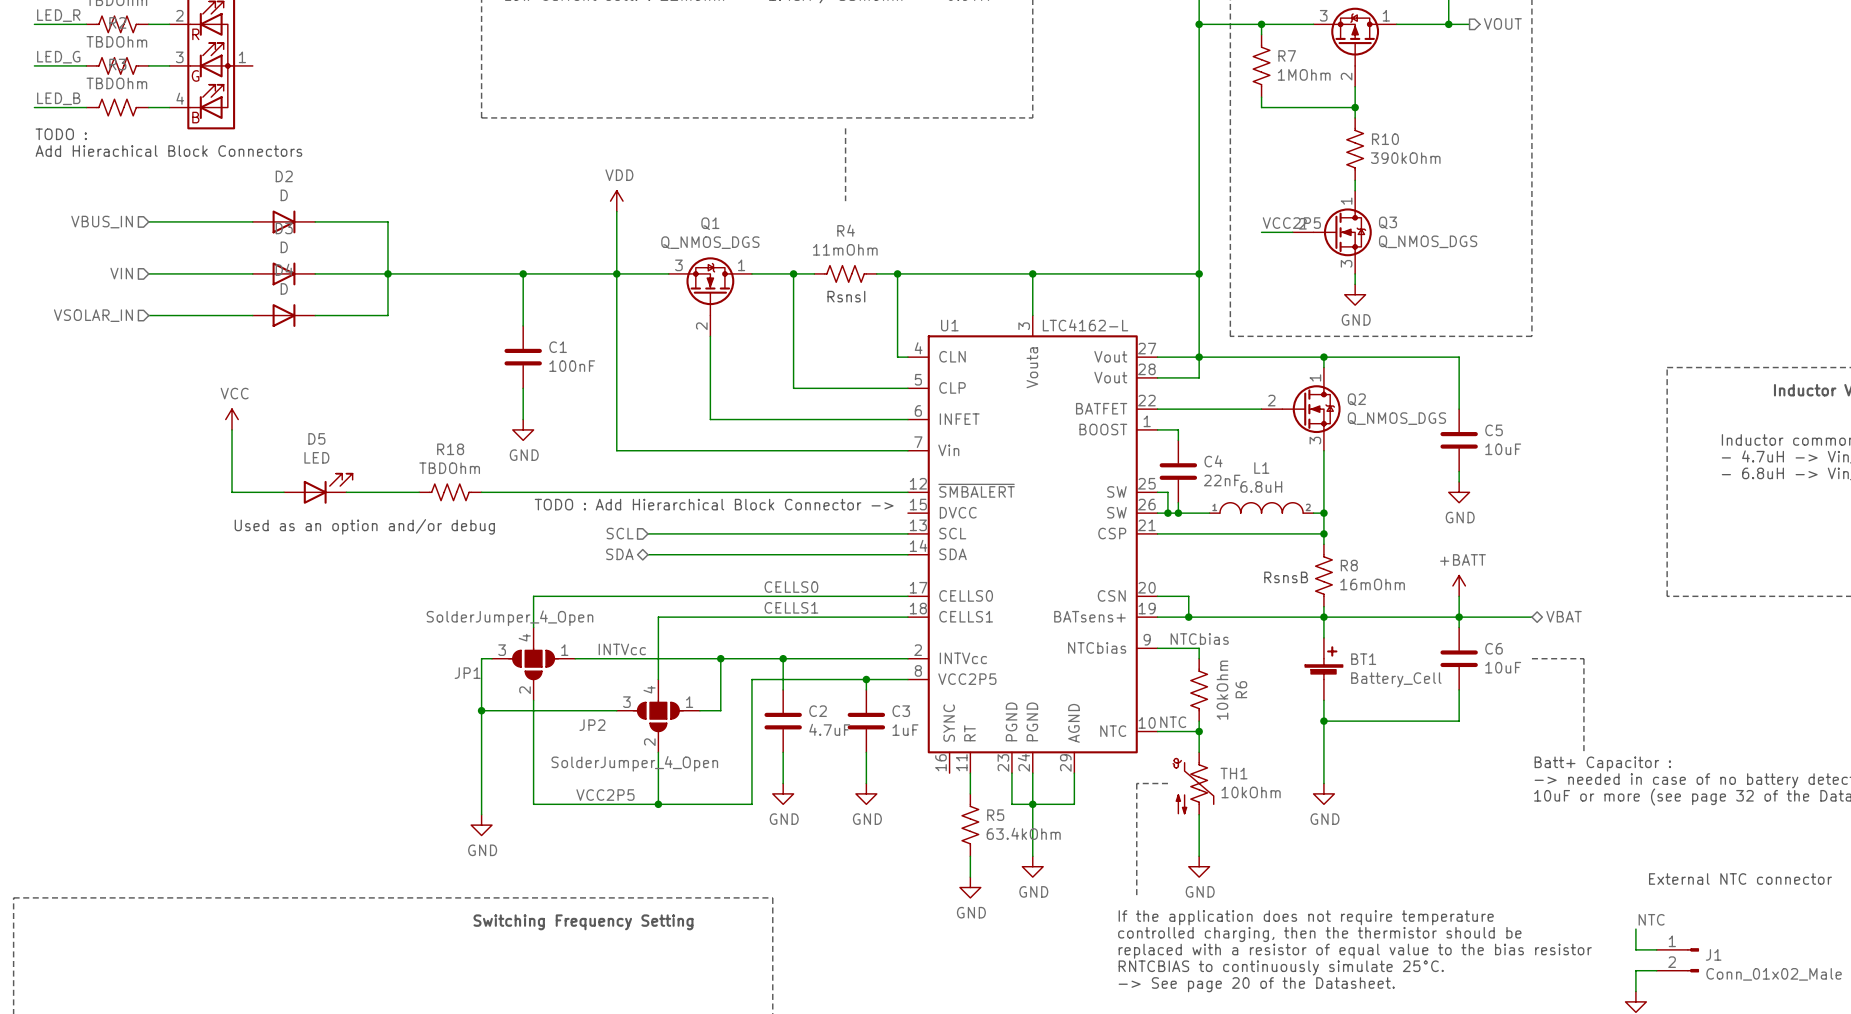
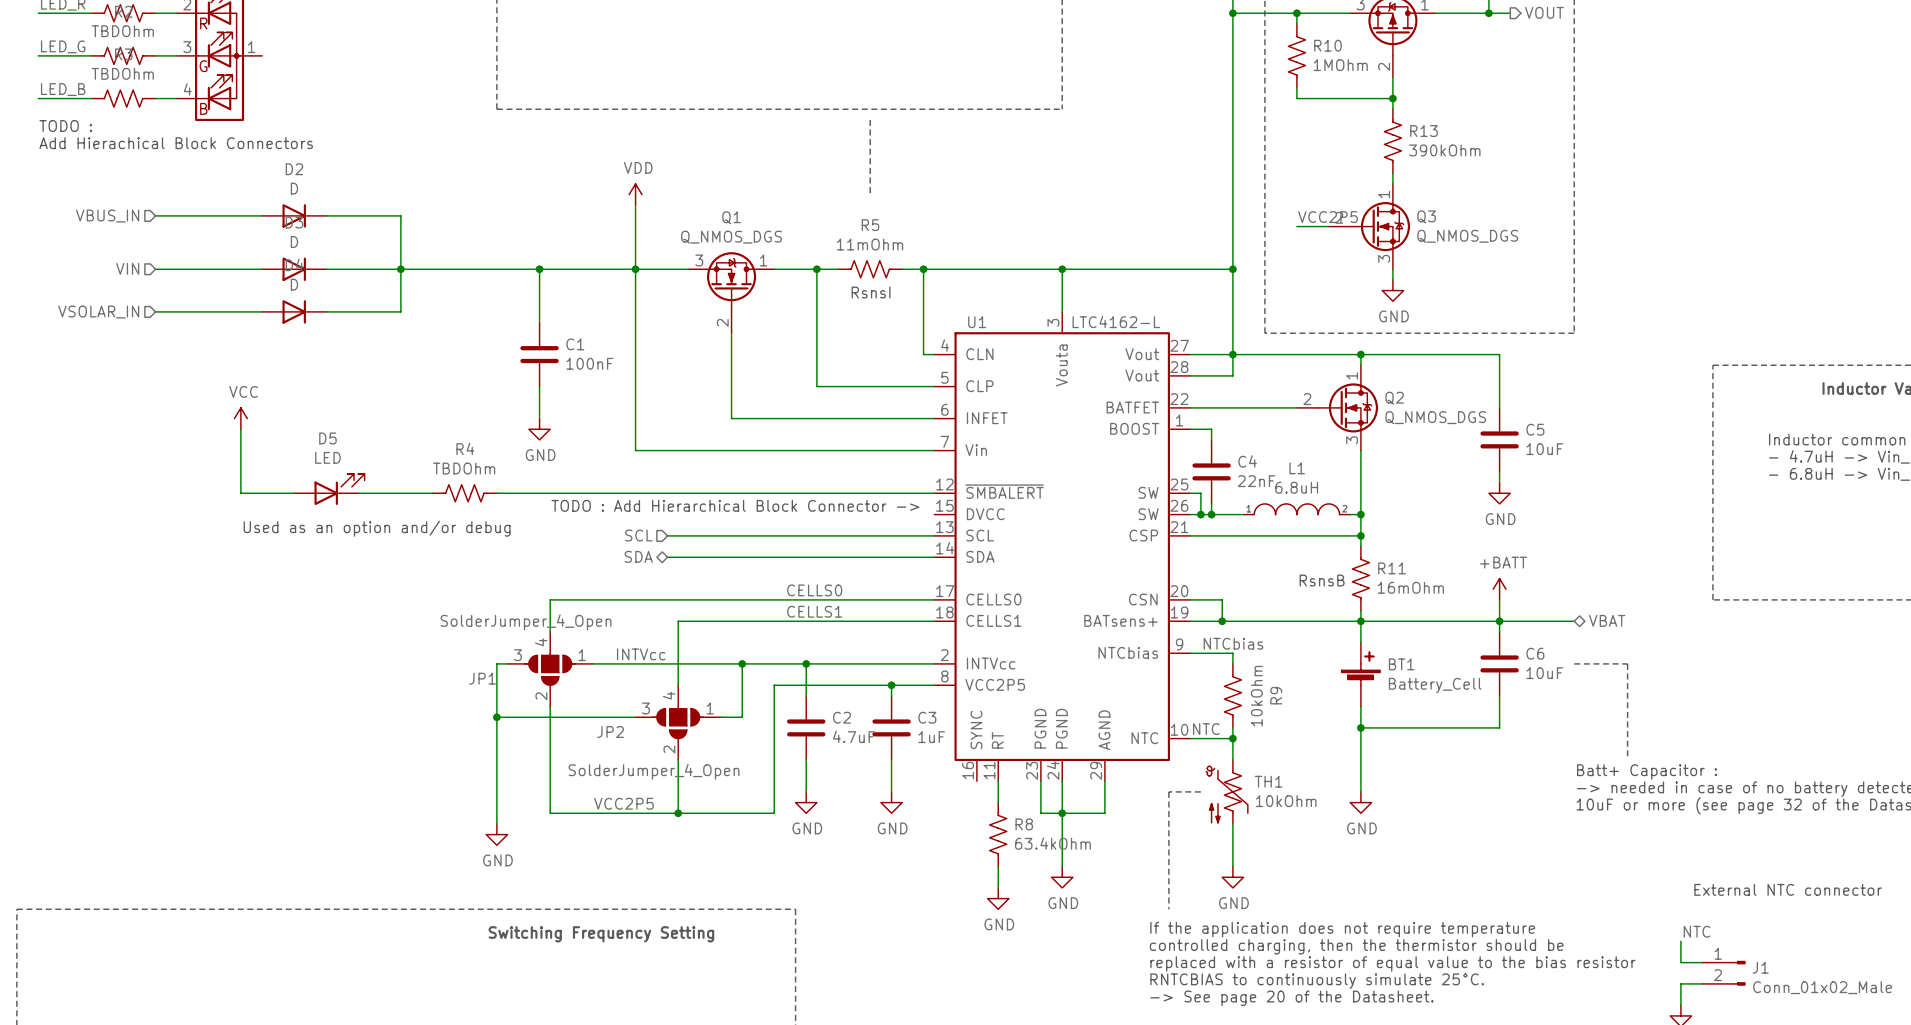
R7 name: R7 (1287, 56) -> R10 (1328, 45)
R10 name: R10 (1385, 139) -> R13 (1424, 131)
R4 name: R4 (846, 230) -> R5 (870, 225)
R18 name: R18 (450, 449) -> R4 (465, 448)
R8 name: R8 (1349, 565) -> R11 (1392, 568)
R6 name: R6 (1241, 689) -> R9 (1276, 695)
R5 name: R5 (995, 815) -> R8 (1024, 824)

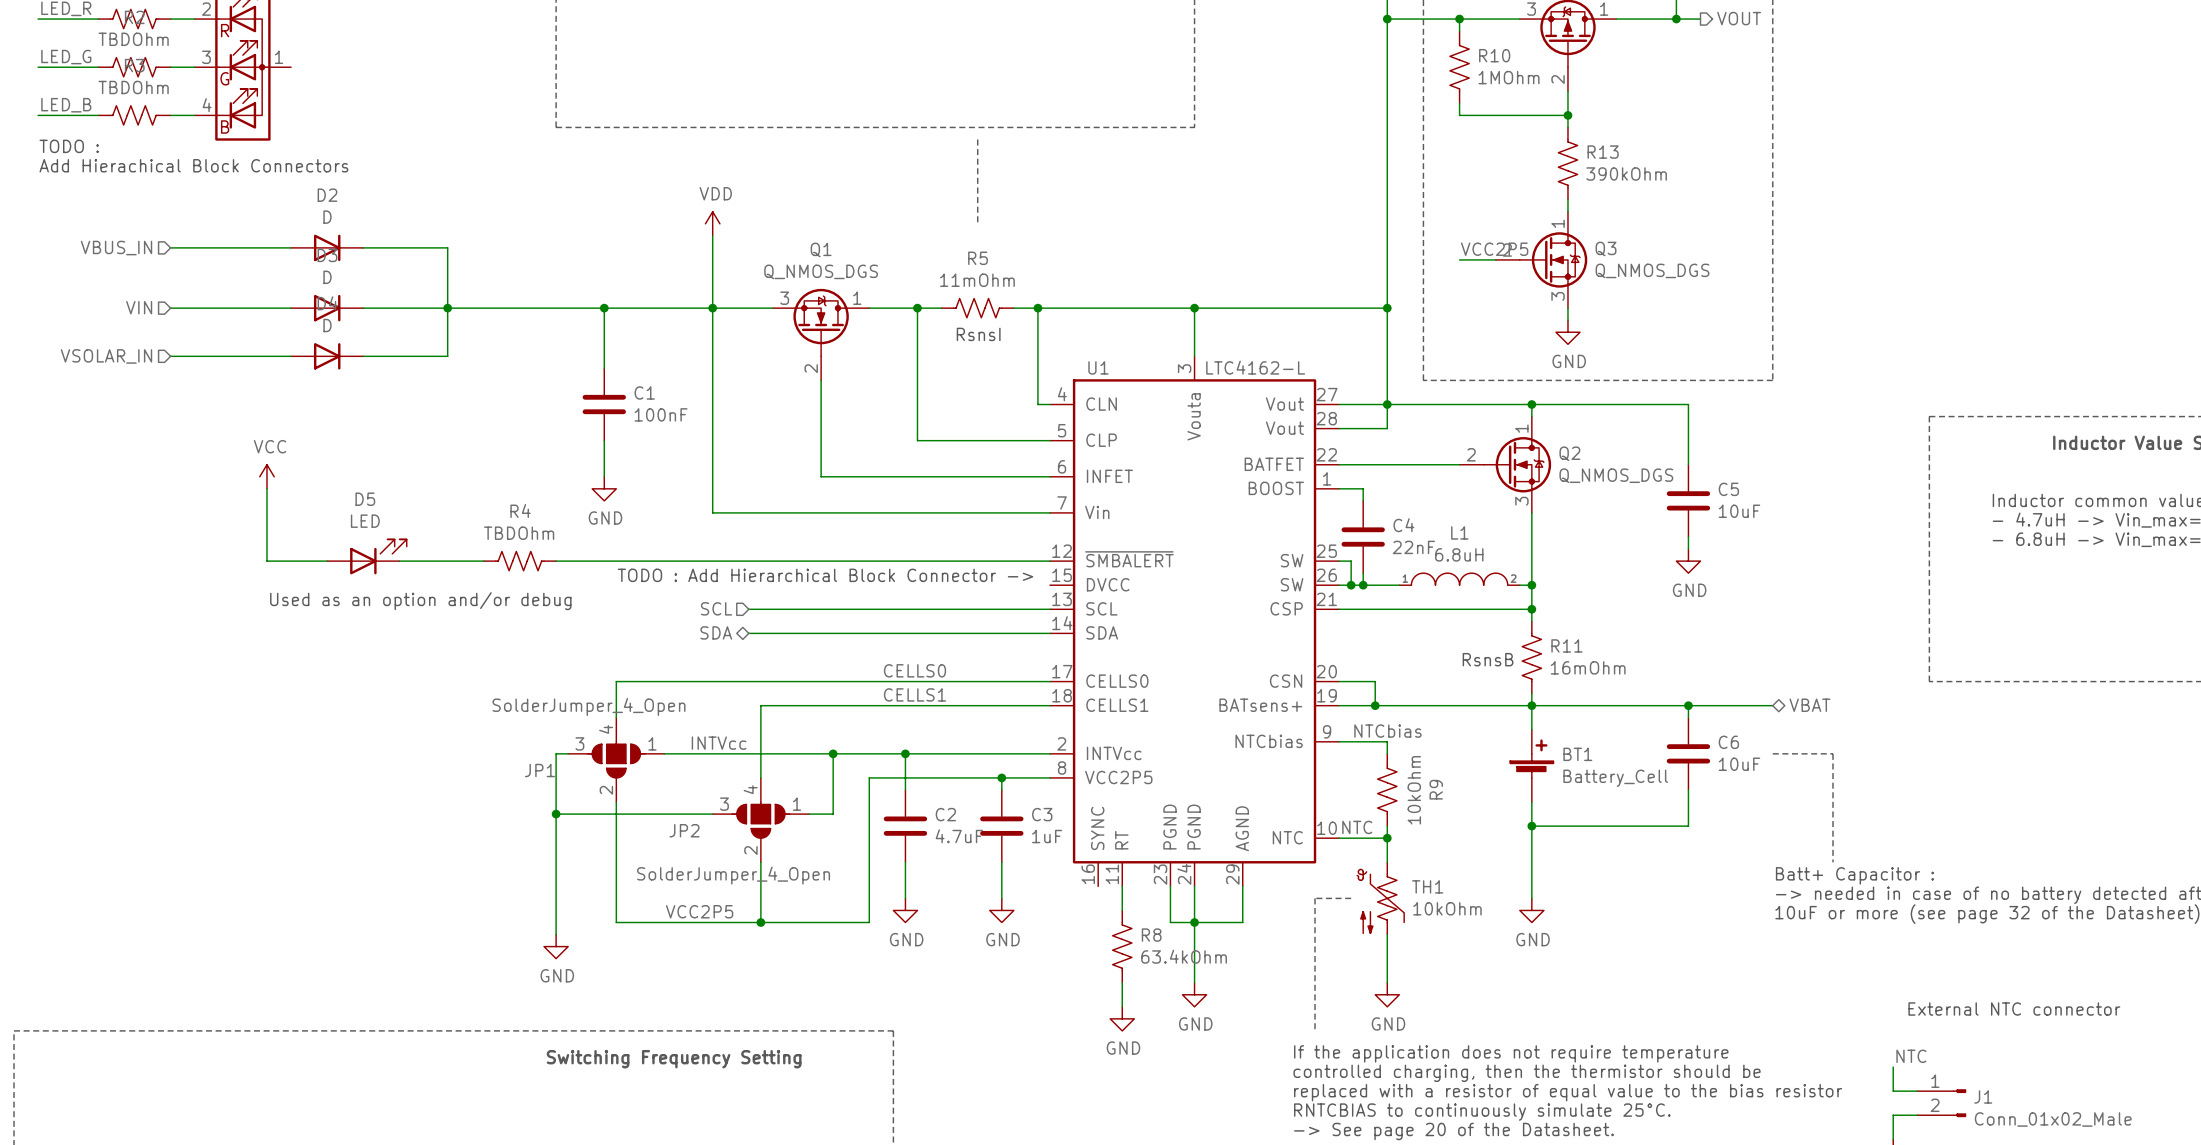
power symbol: +BATT (1499, 589) -> none
wire: (1499, 599) (1499, 621) -> none

